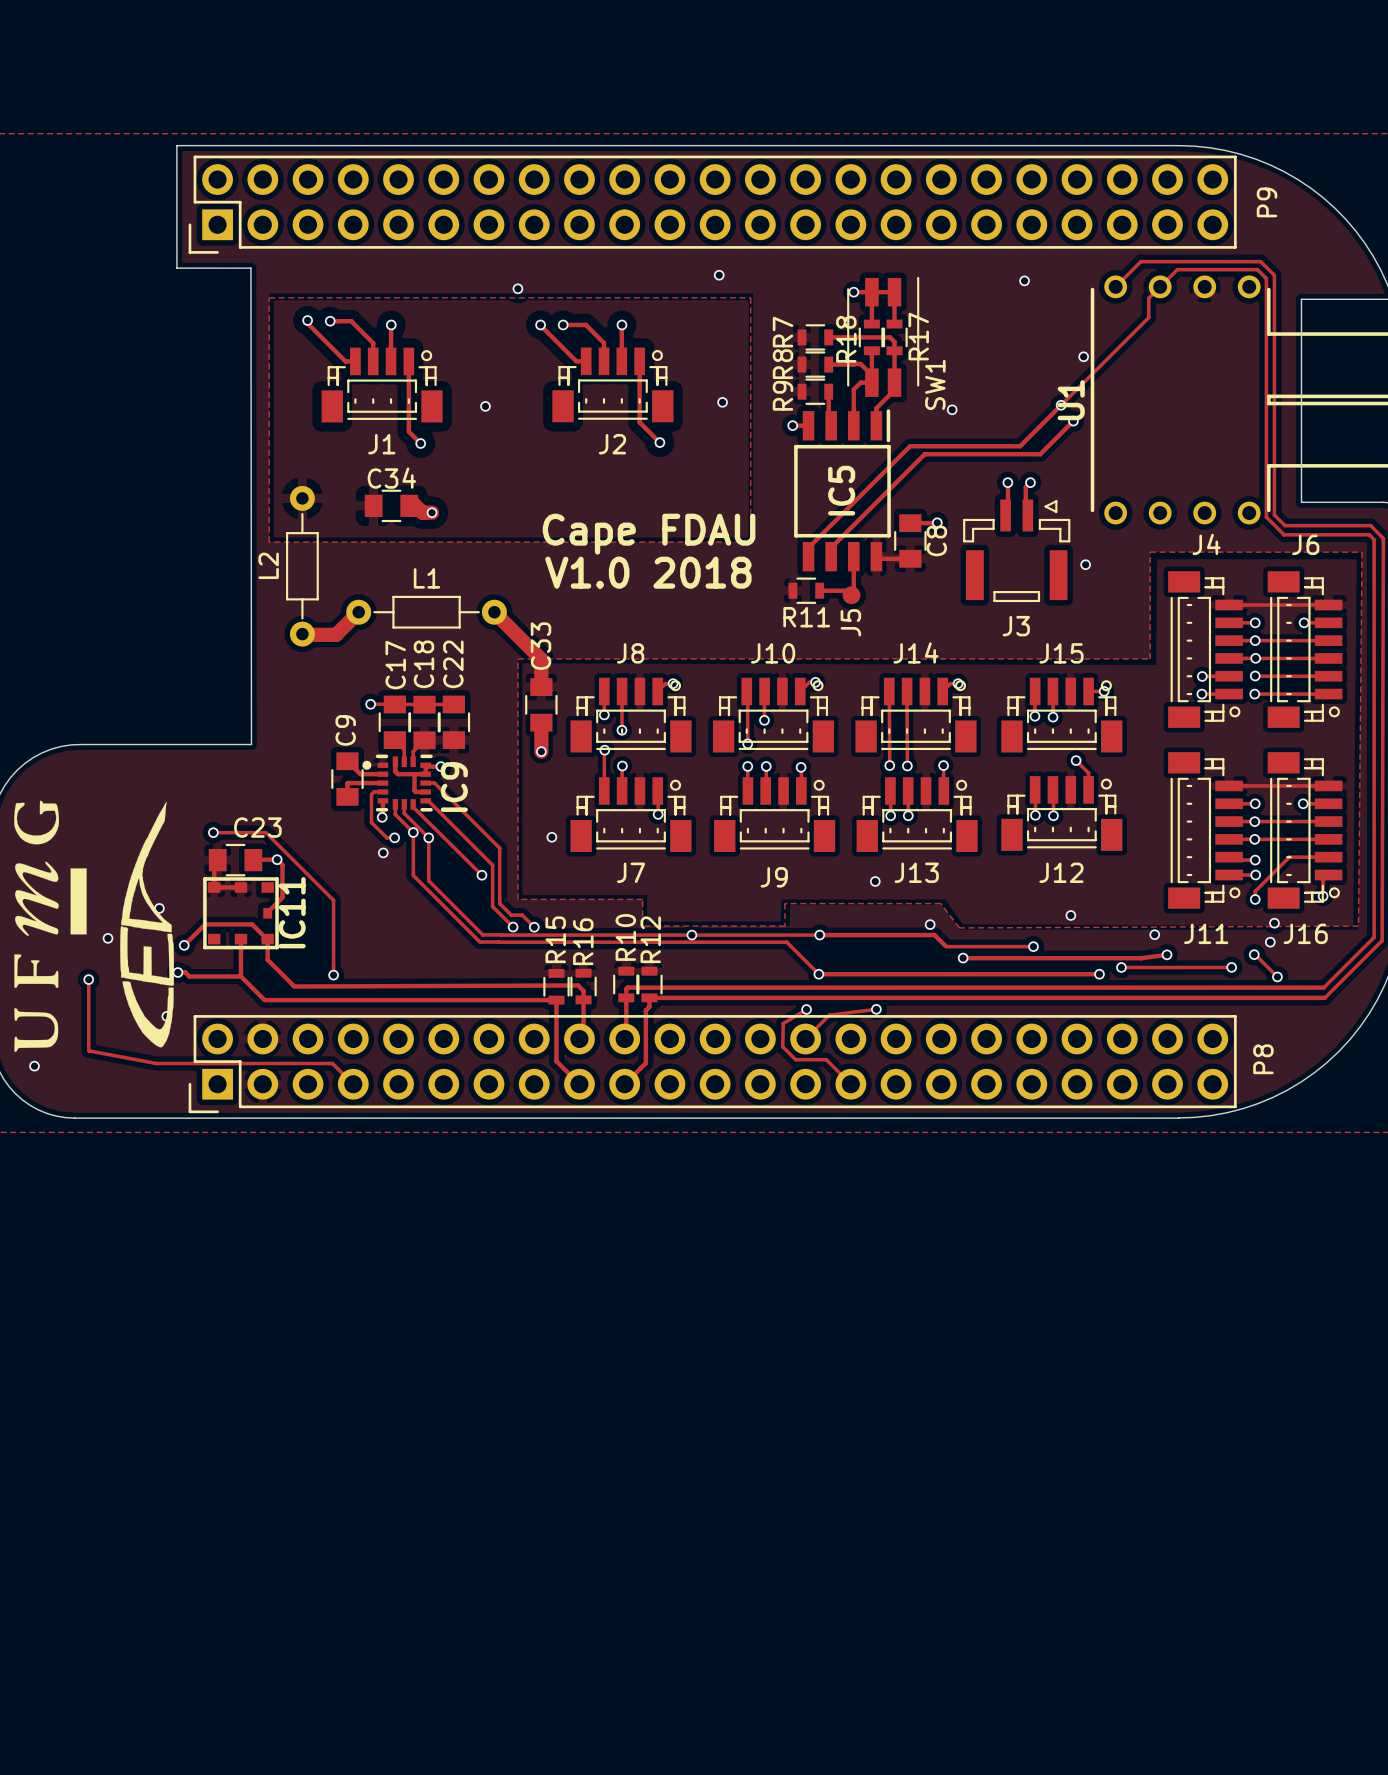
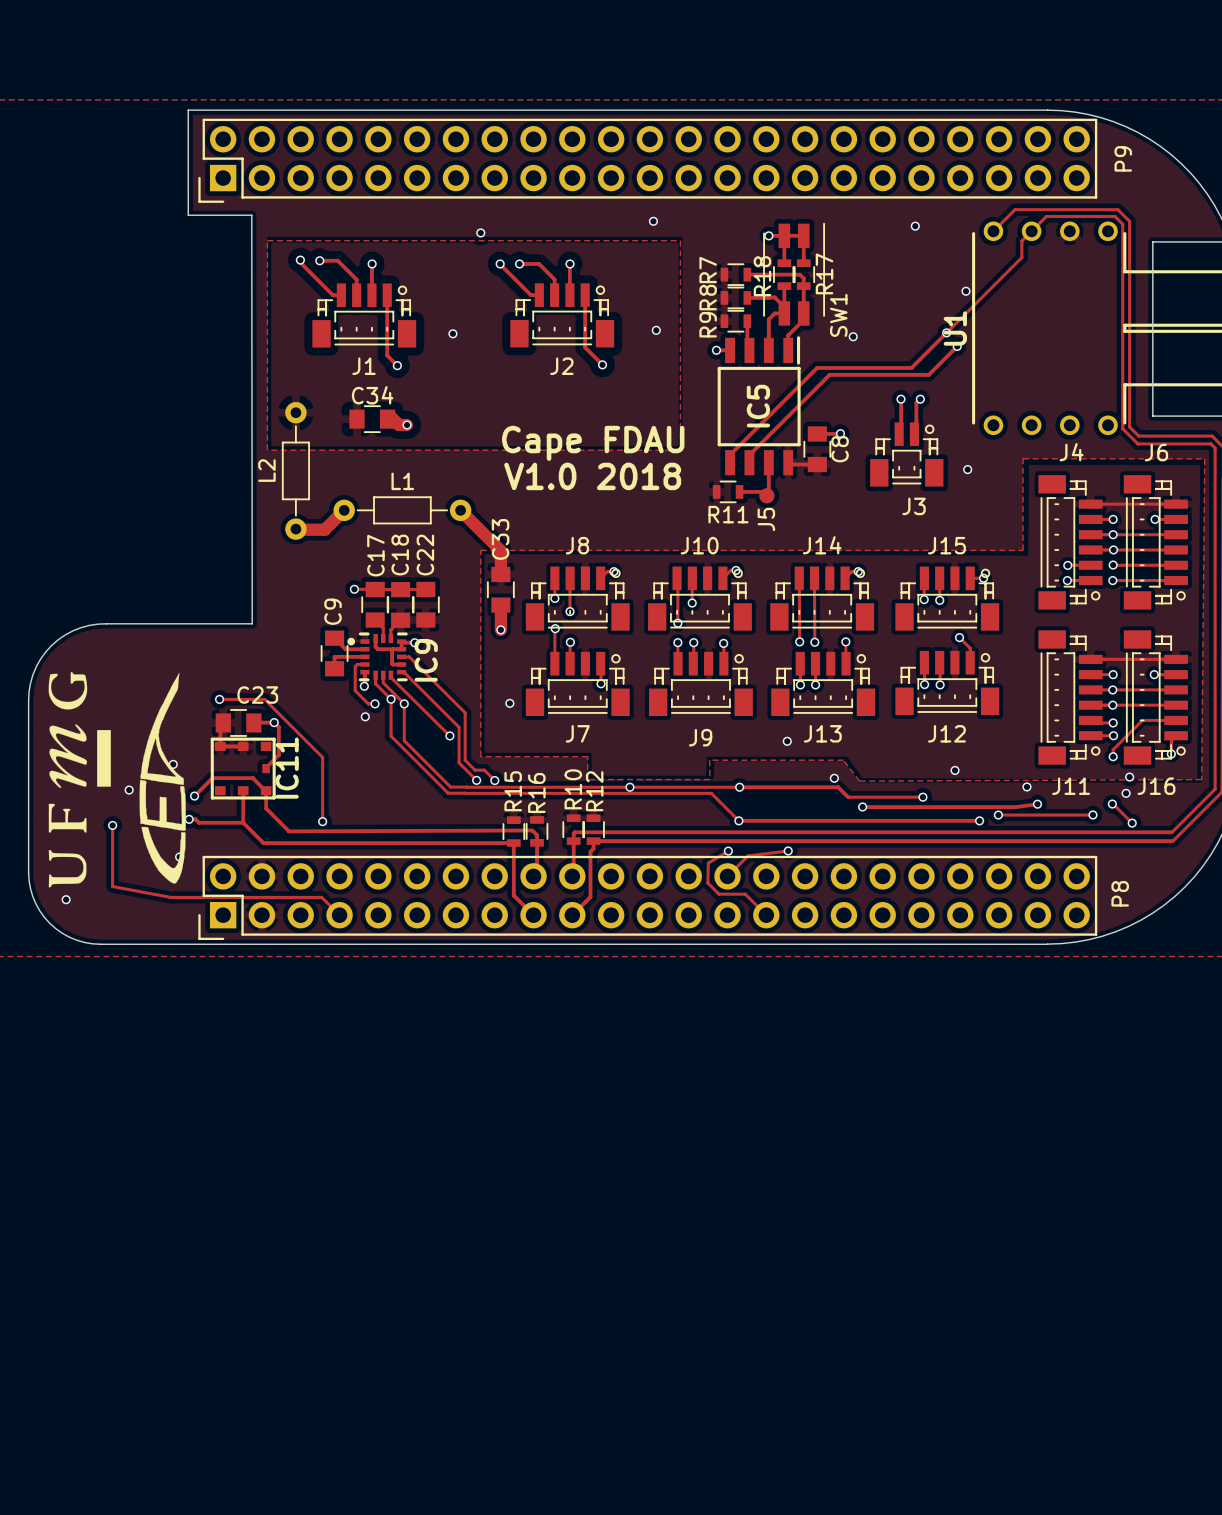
J3 footprint: [963, 499, 1071, 603] -> [870, 422, 944, 487]

